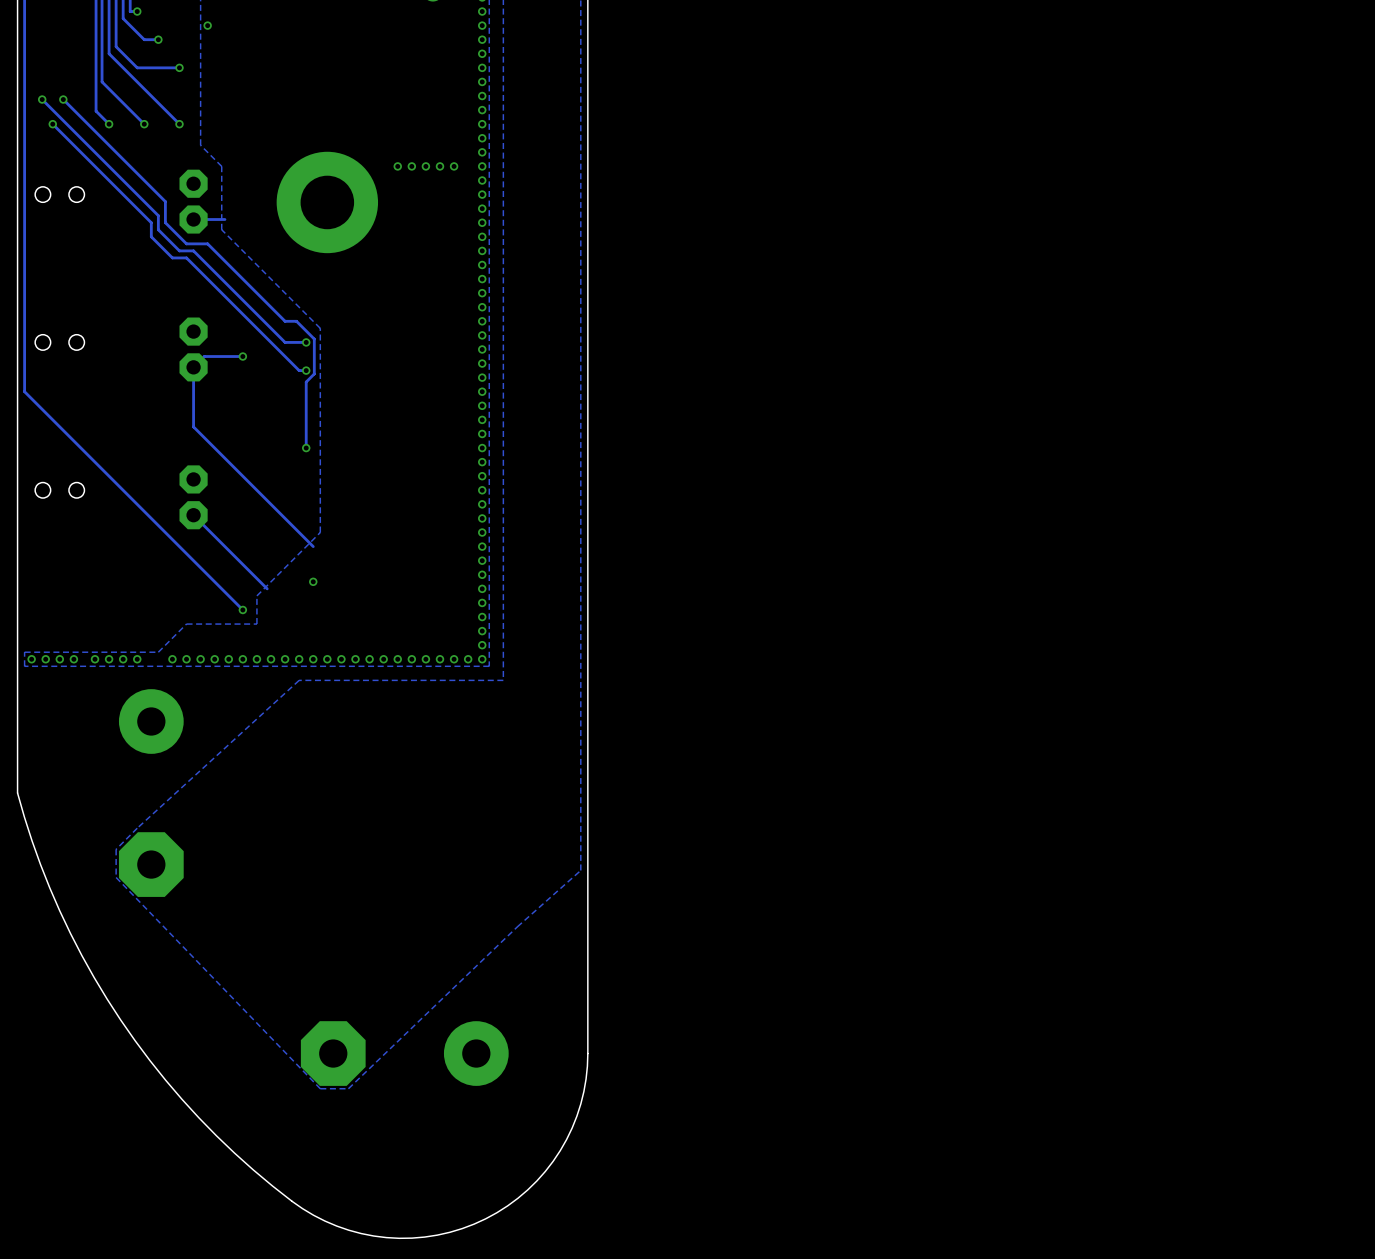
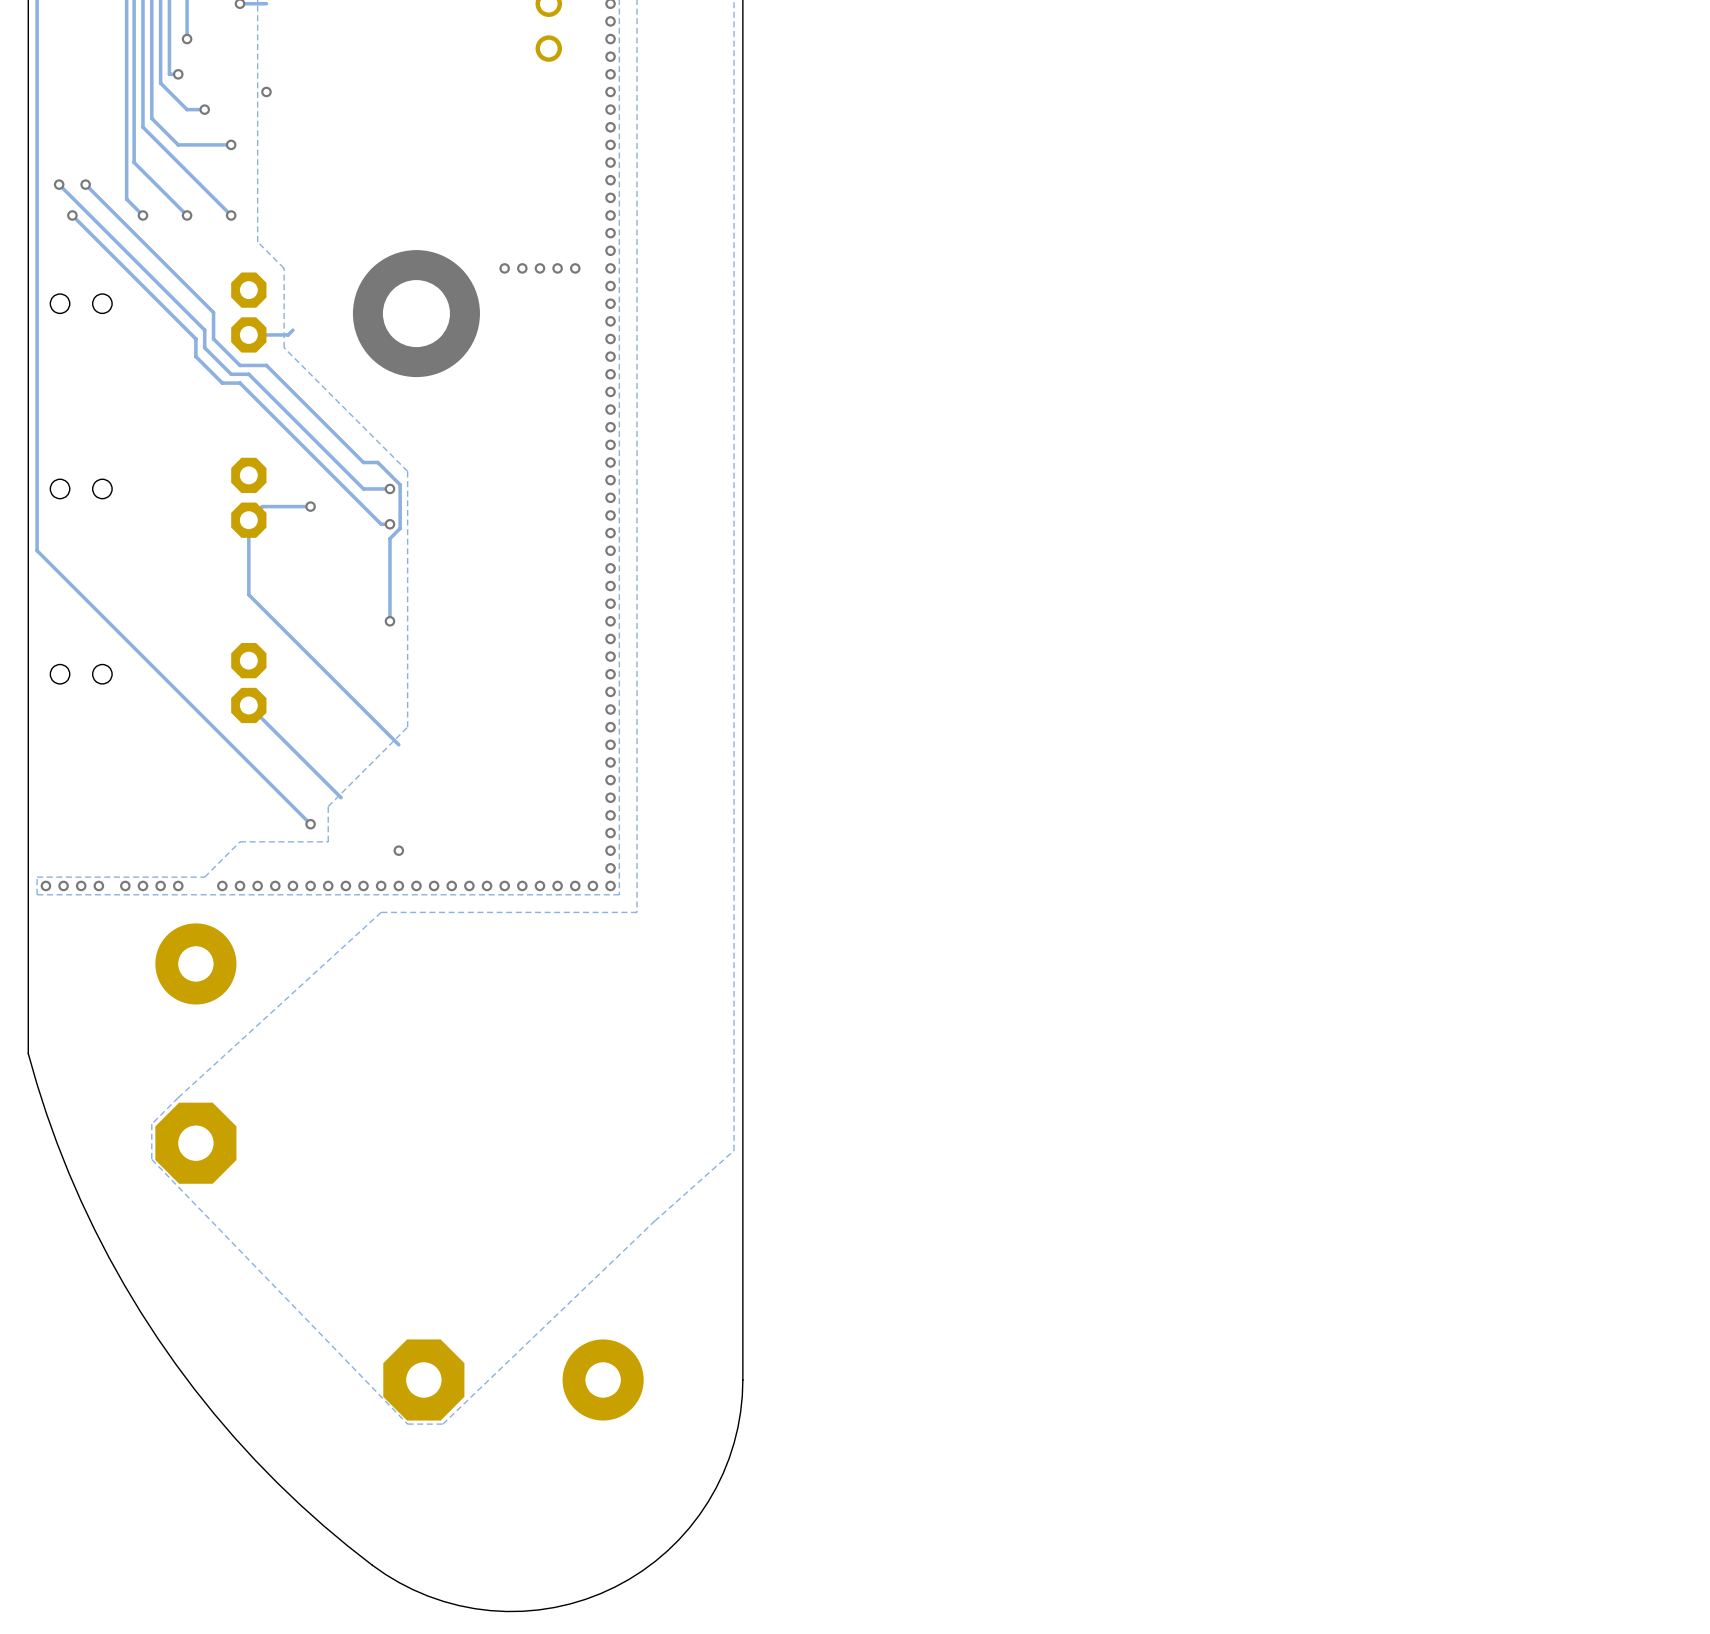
track: none -> (292, 330) (288, 334)
via position: (313, 581) -> (398, 850)

